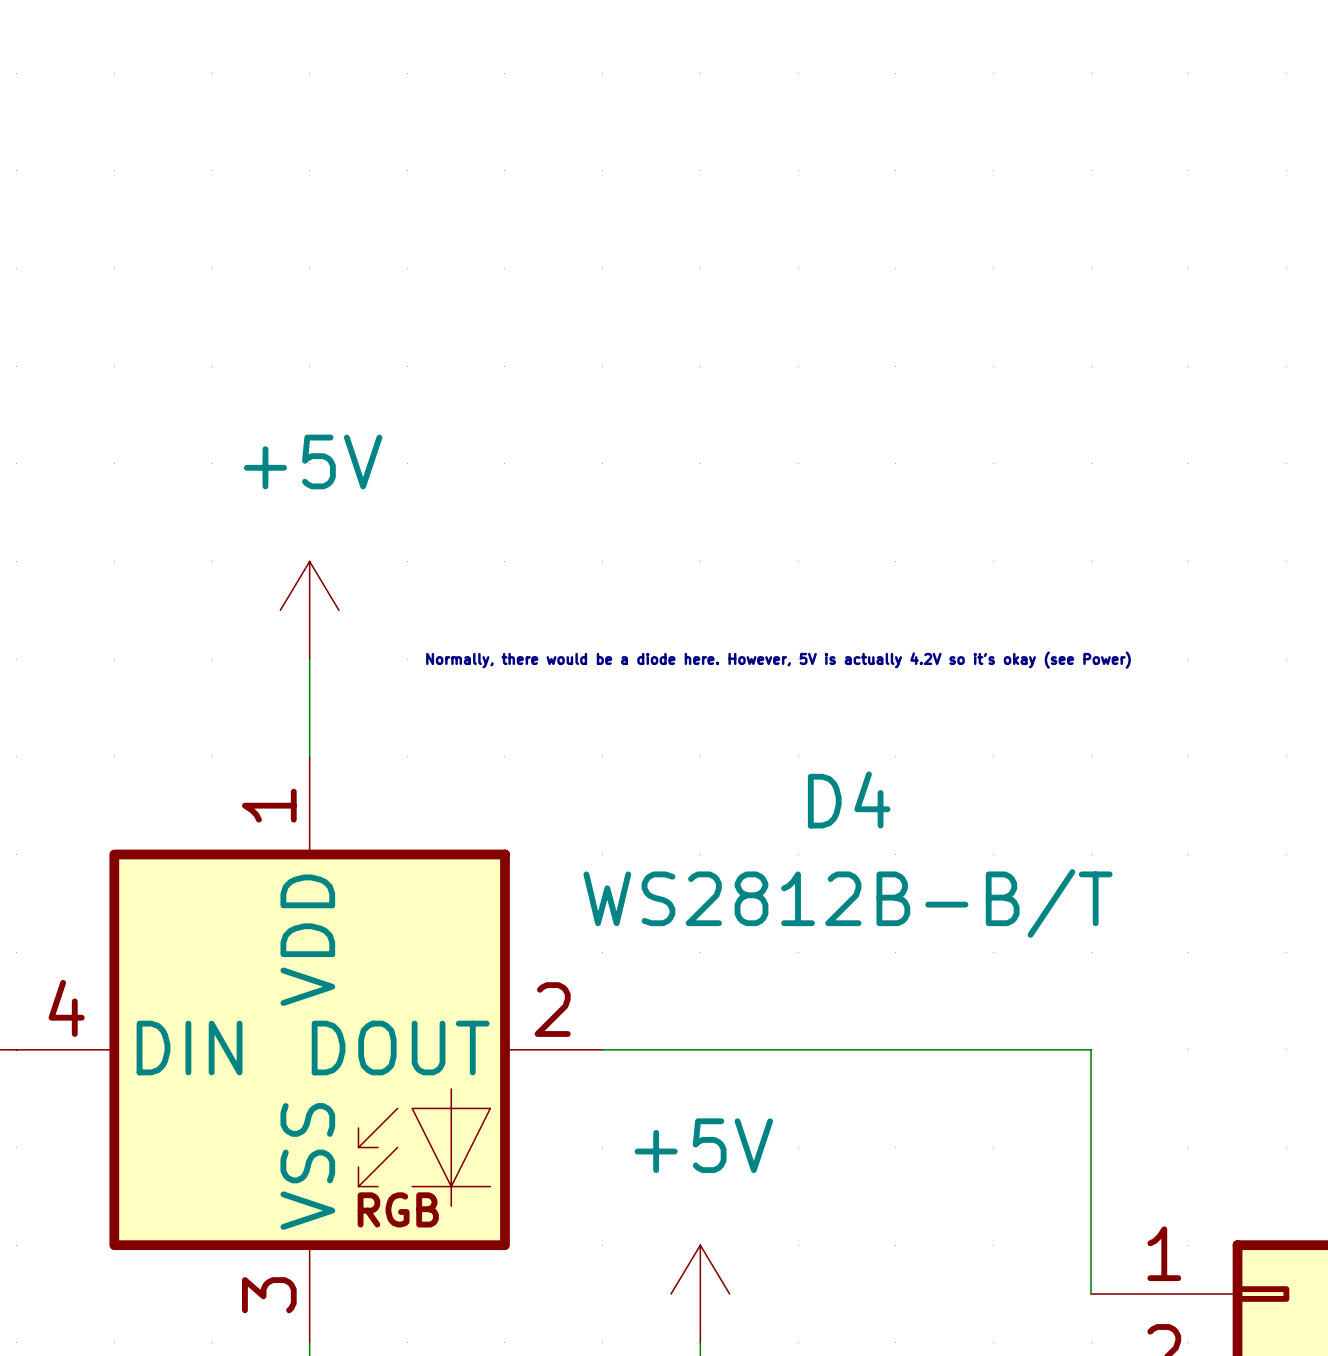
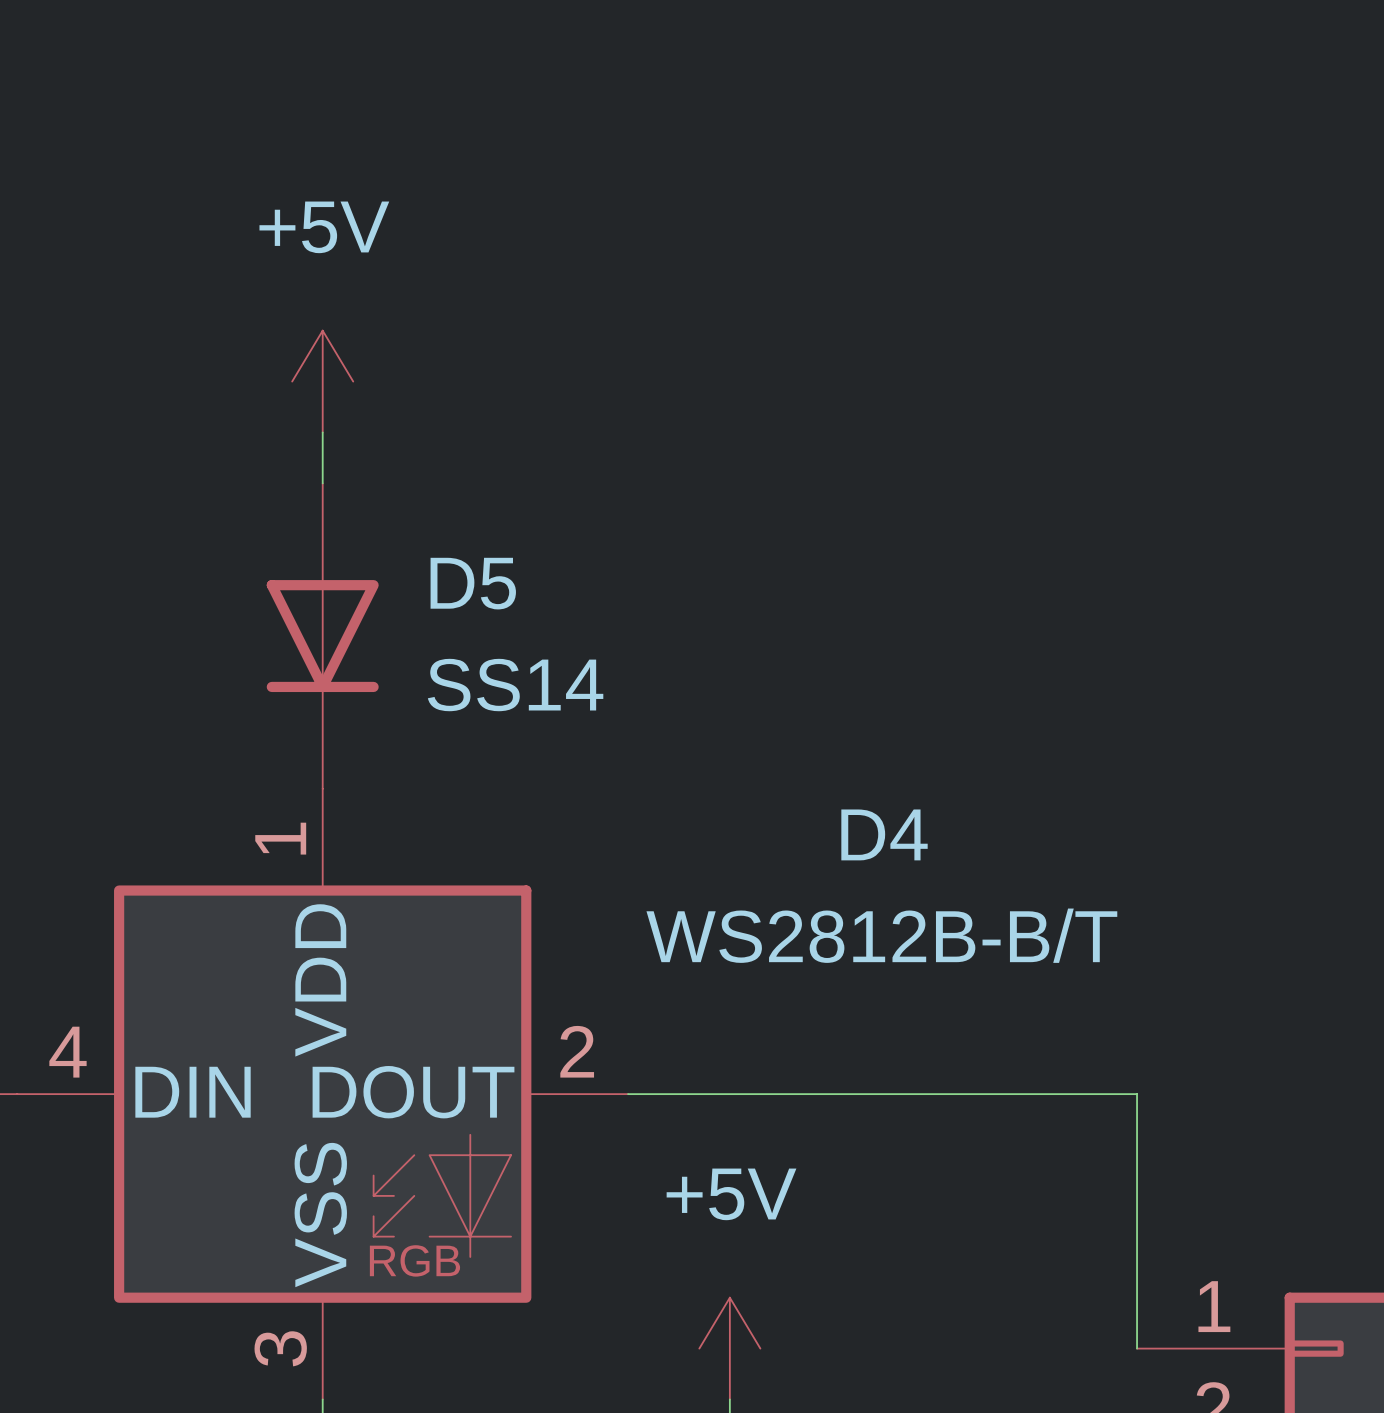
wire: none -> (322, 432) (322, 483)
power symbol position: +5V (309, 610) -> +5V (322, 381)
D5: none -> SS14 (322, 636)
text: Normally, there would be a diode here. However, 5V is actually 4.2V so it's okay (see Power) (778, 660) -> none

